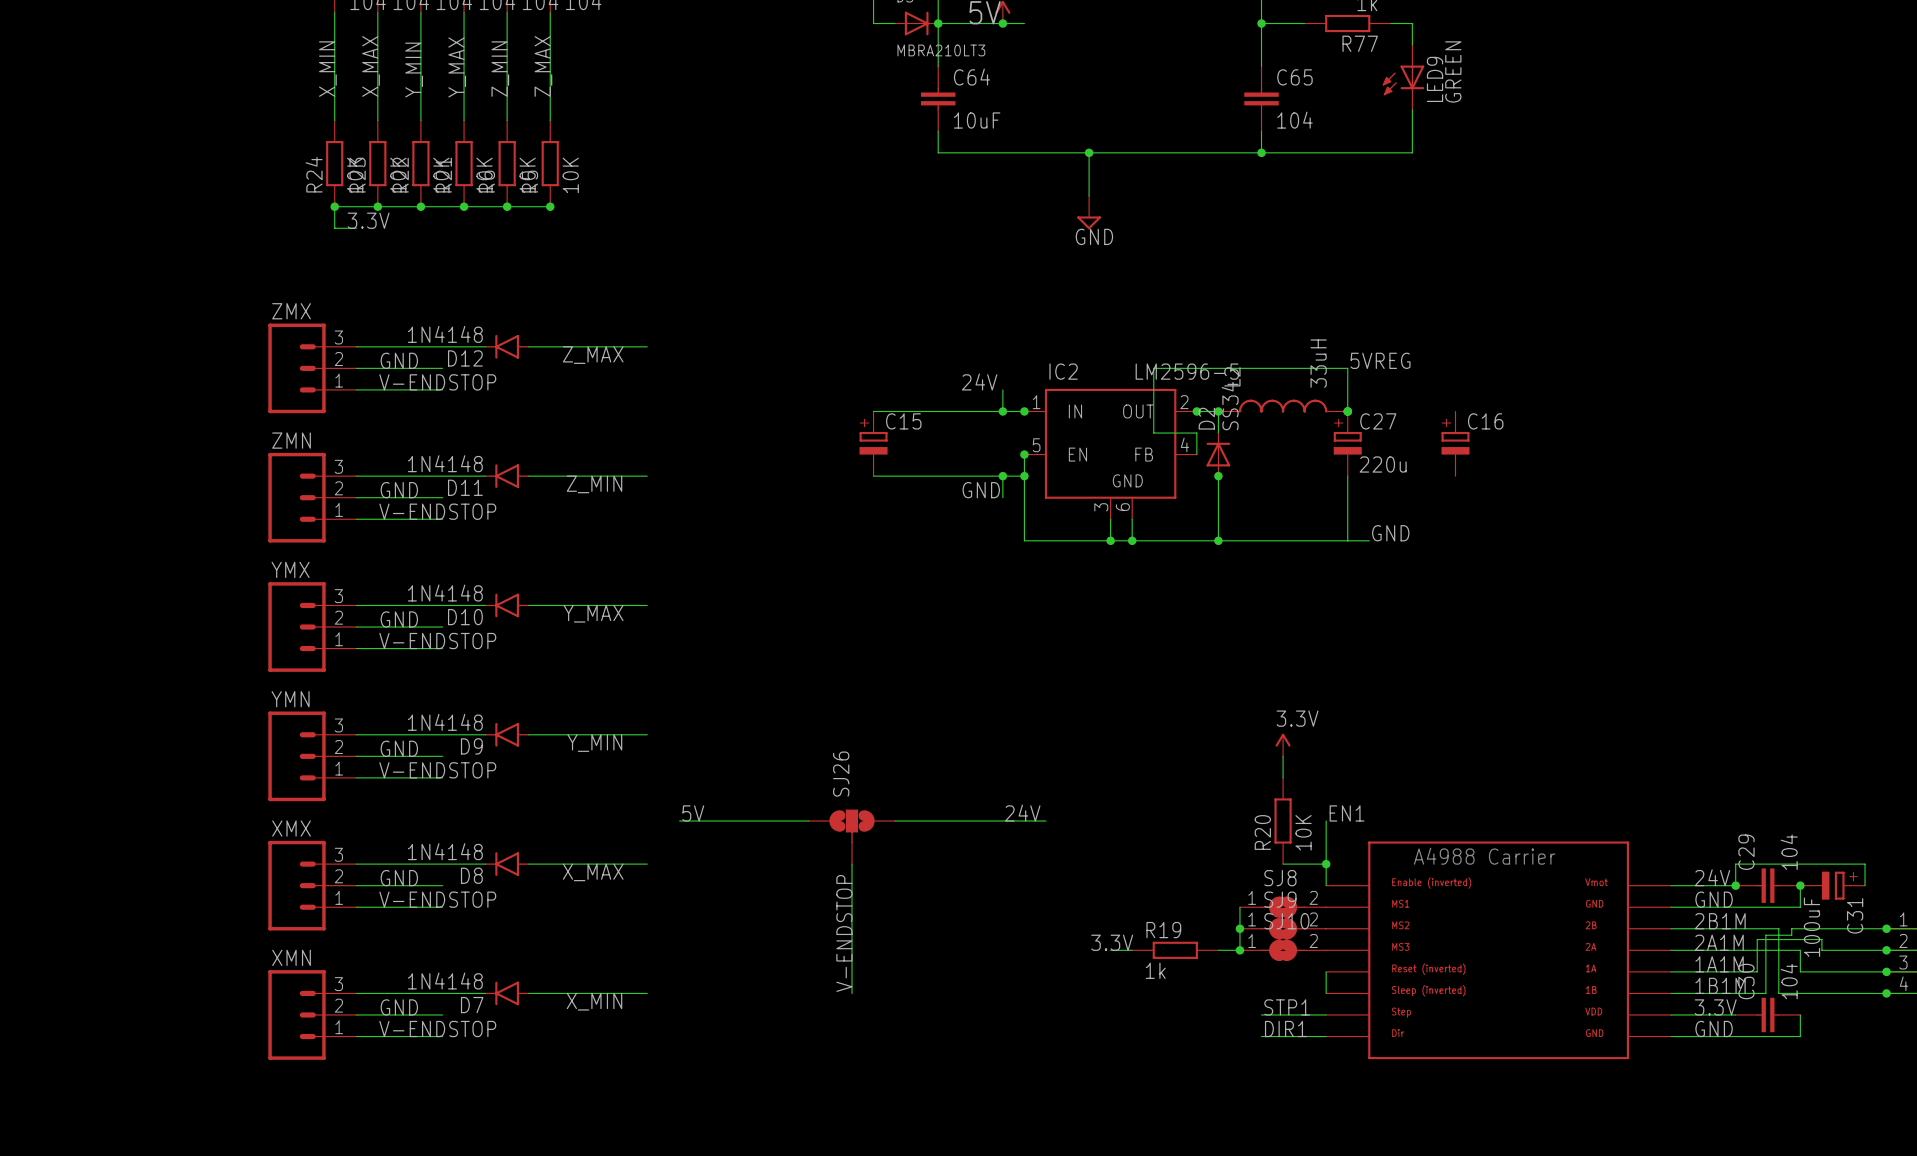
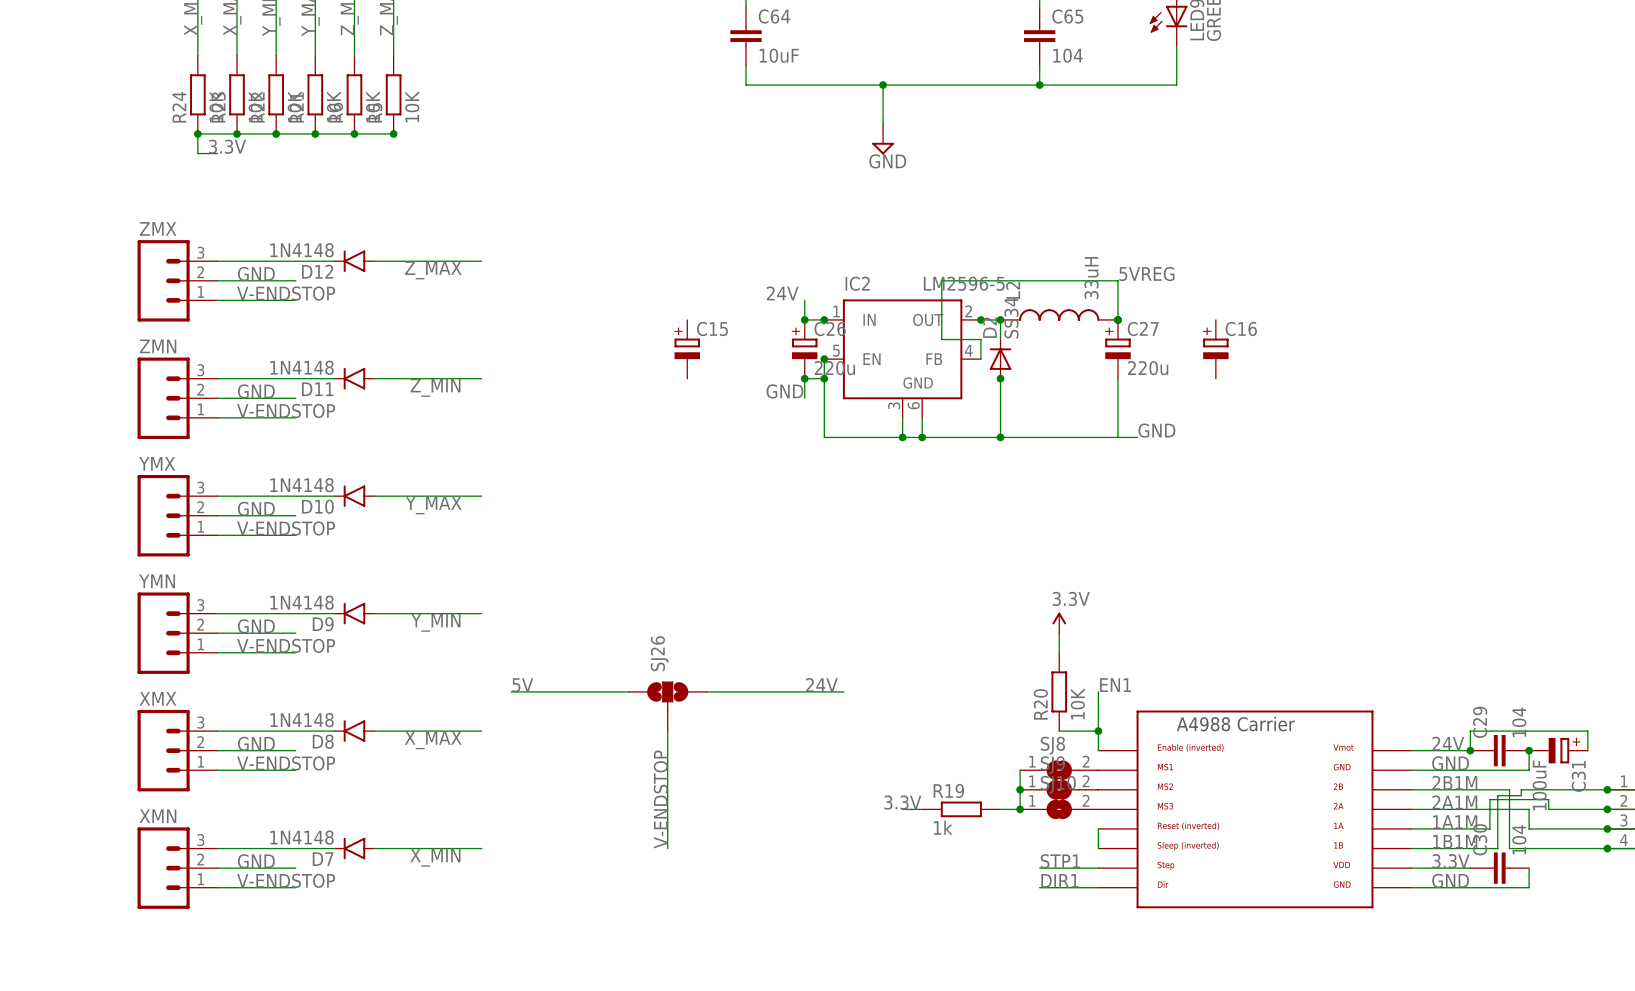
wire: (873, 411) (1002, 411) -> none
C26: none -> 220u (804, 349)
wire: (873, 476) (1002, 476) -> none

